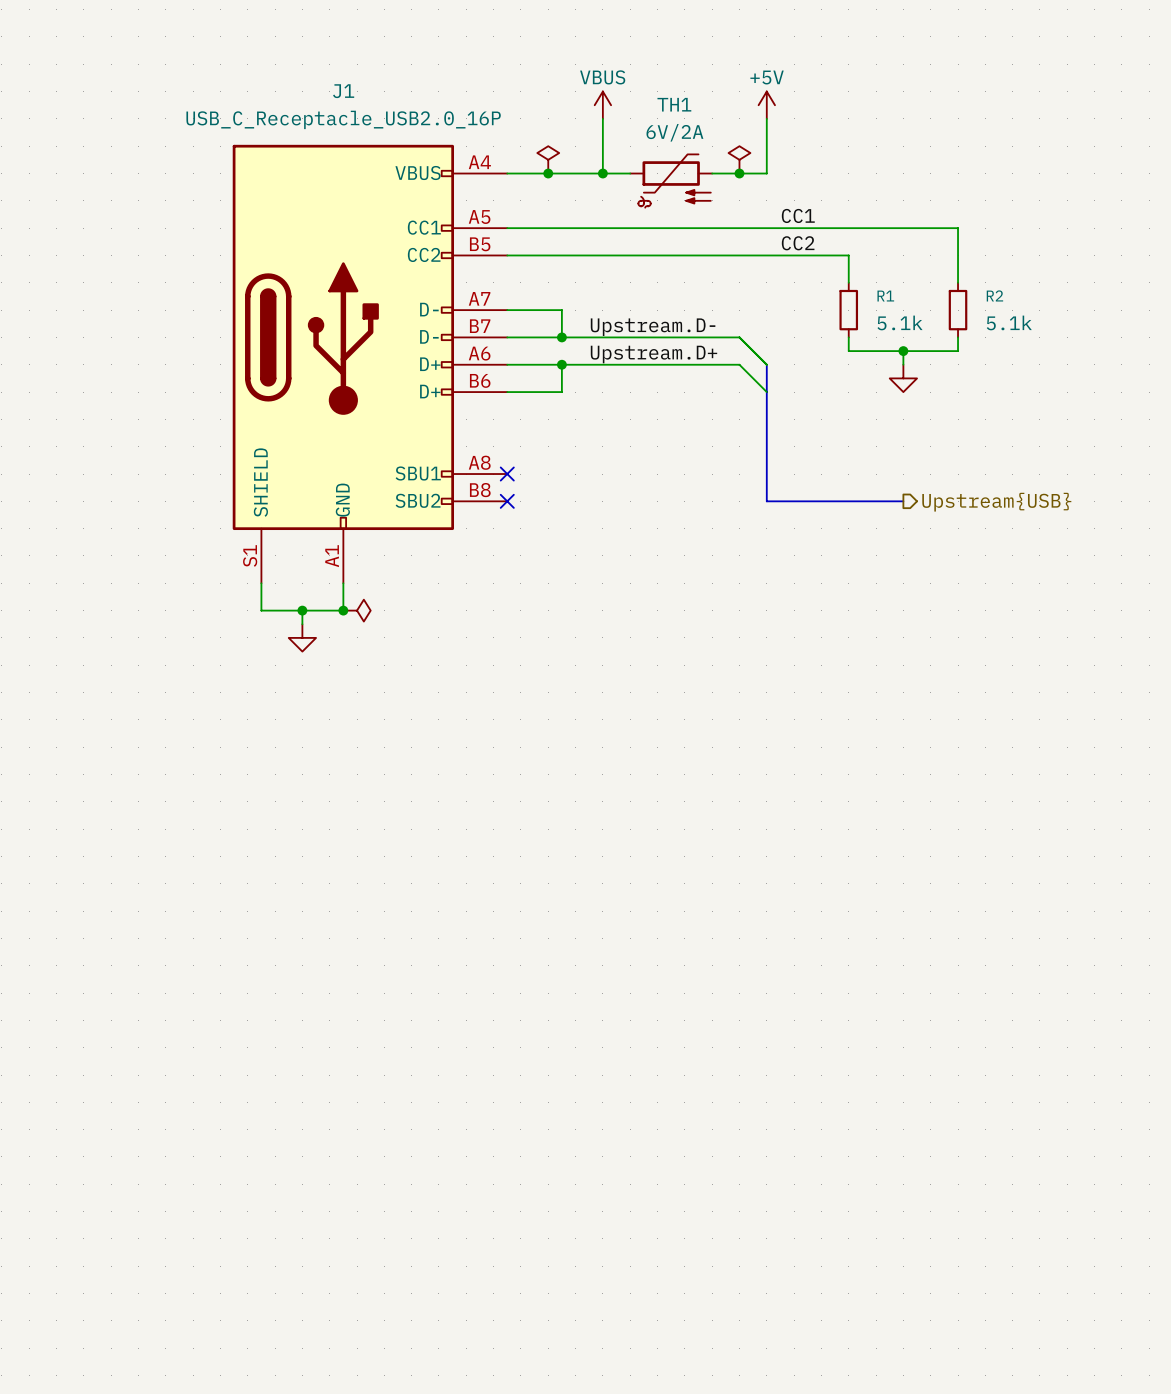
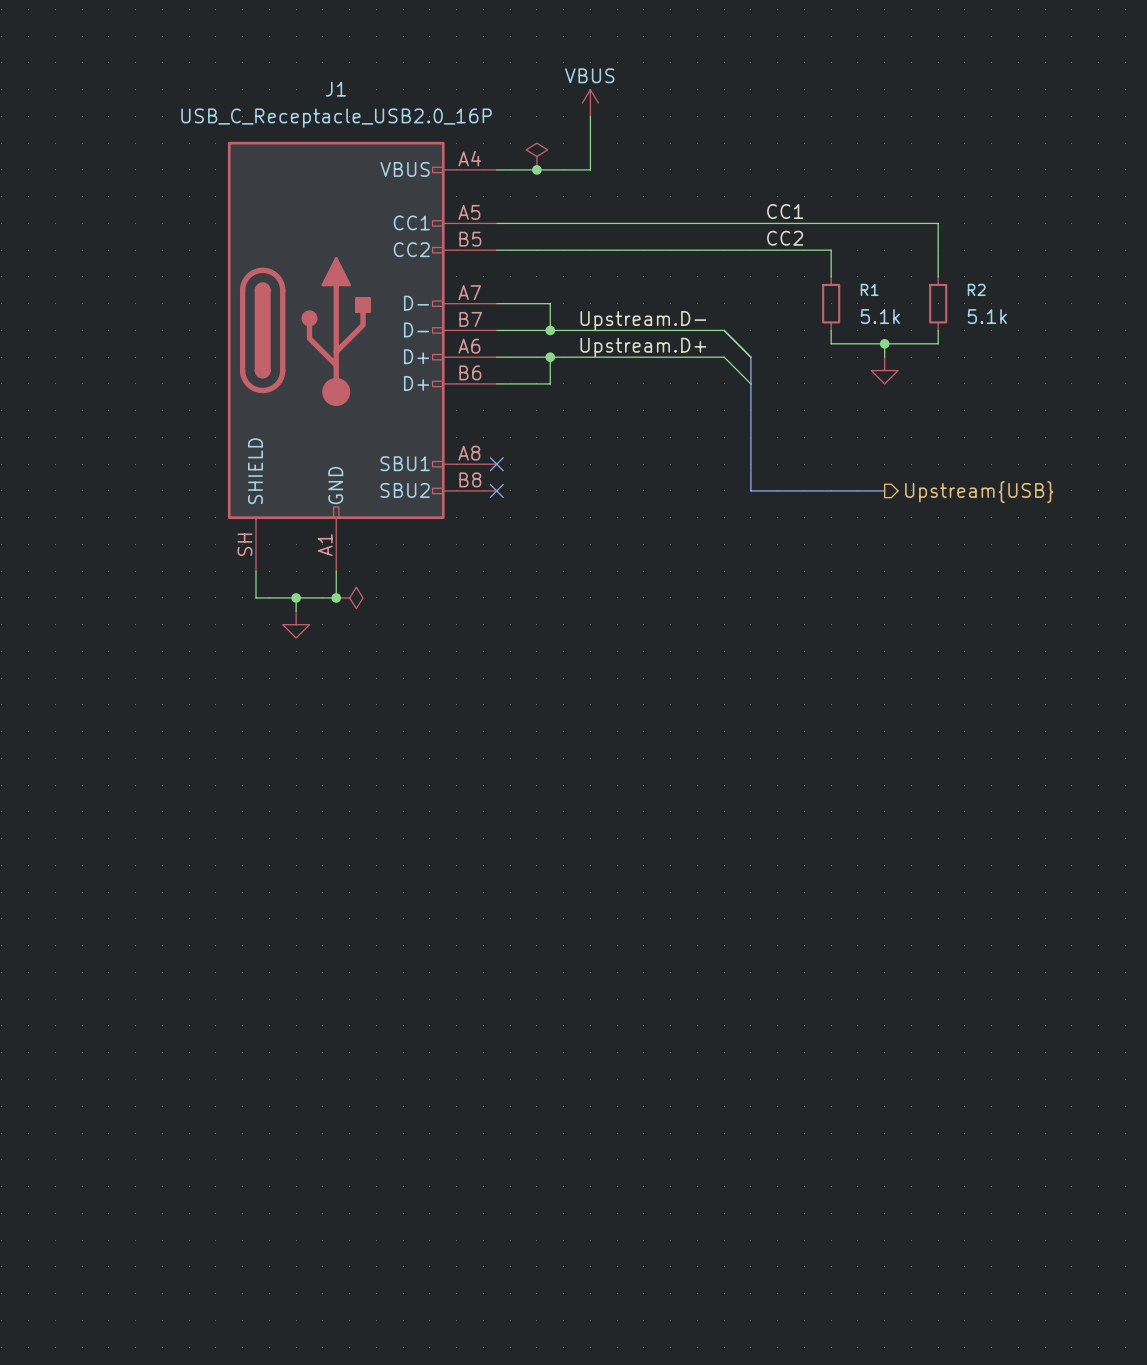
power symbol: +5V (766, 105) -> none
wire: (766, 118) (766, 173) (712, 173) -> none
power symbol: (739, 159) -> none
wire: (602, 173) (630, 173) -> none
junction: (602, 173) -> none
junction: (739, 173) -> none
TH1: 6V/2A (671, 181) -> none
J1 pin number: S1 (250, 555) -> SH (244, 544)

